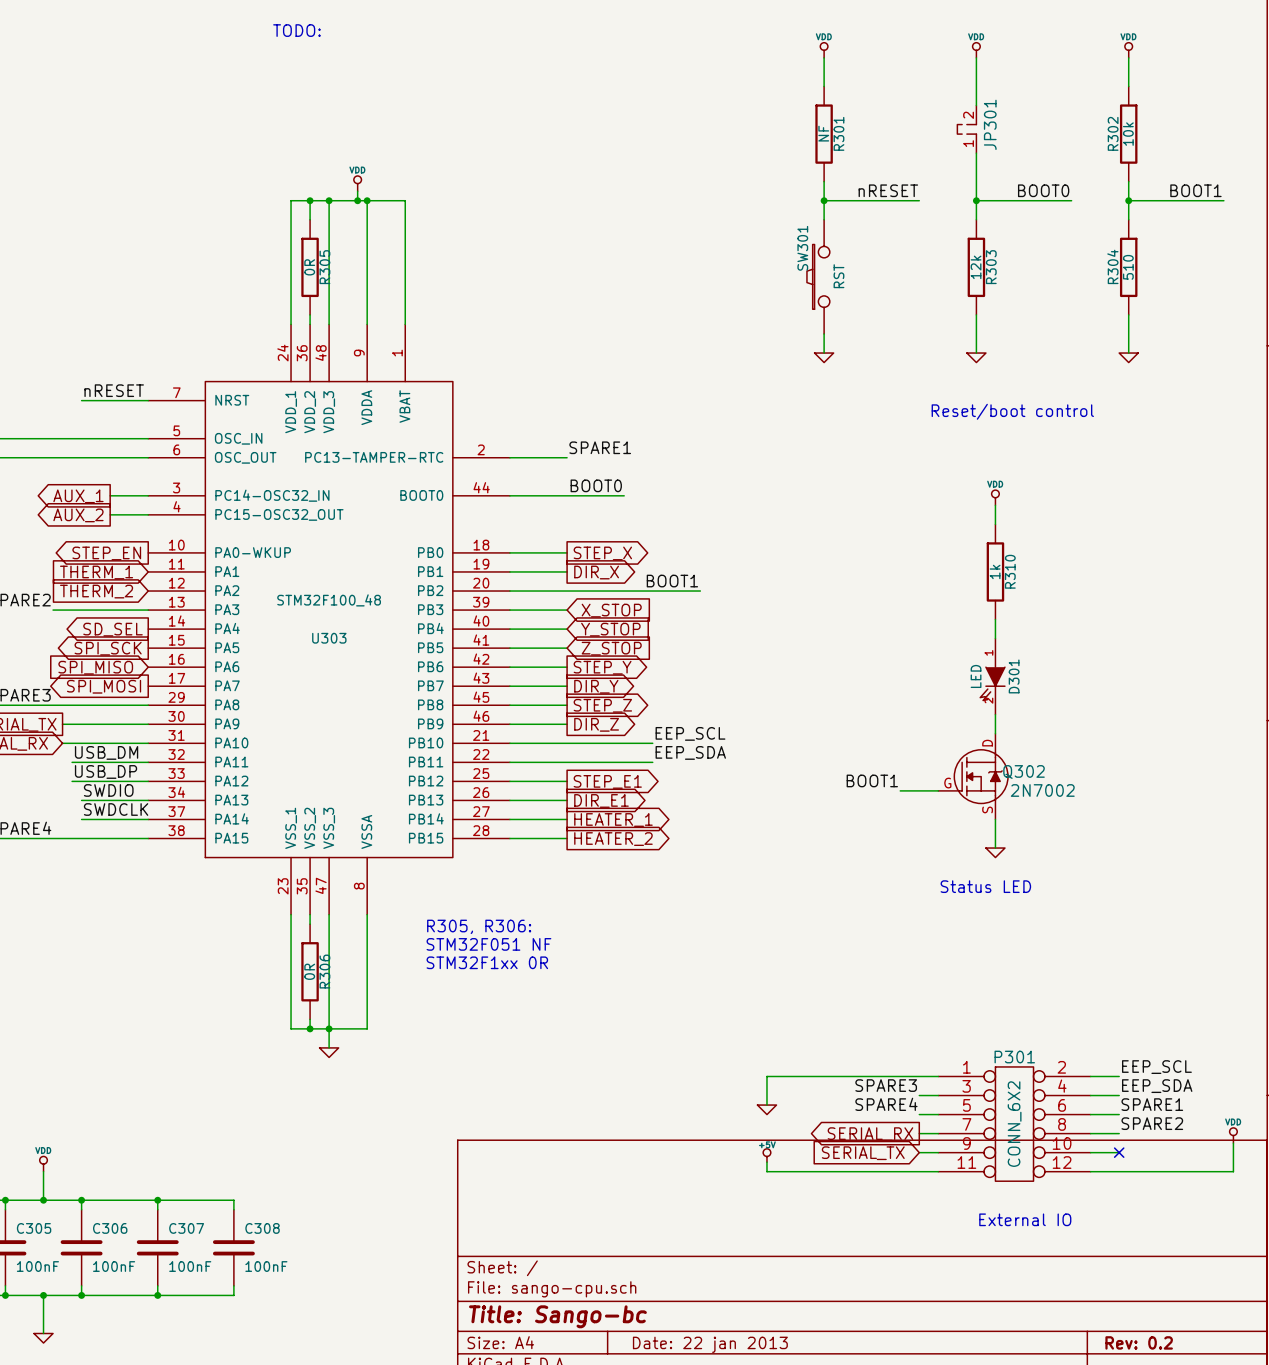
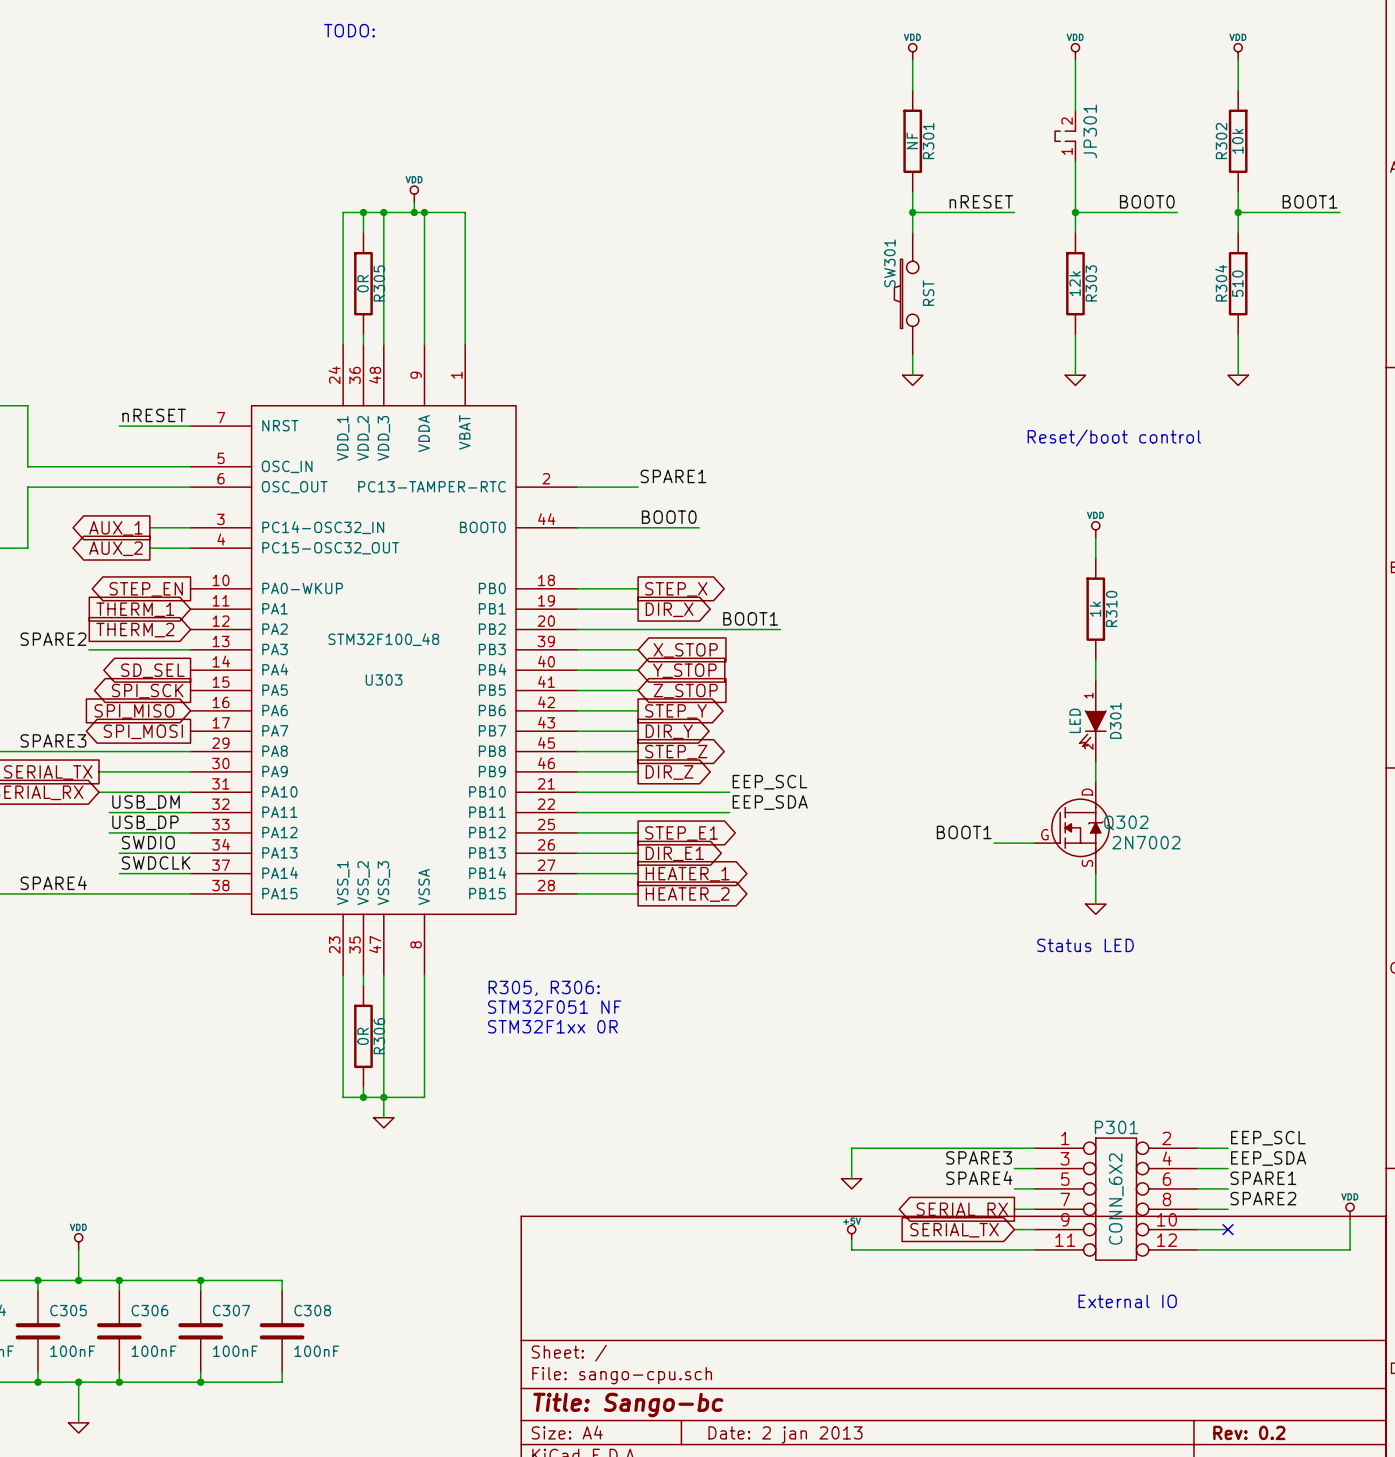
title block: Date: 22 jan 2013 (710, 1344) -> Date: 2 jan 2013 (785, 1434)

